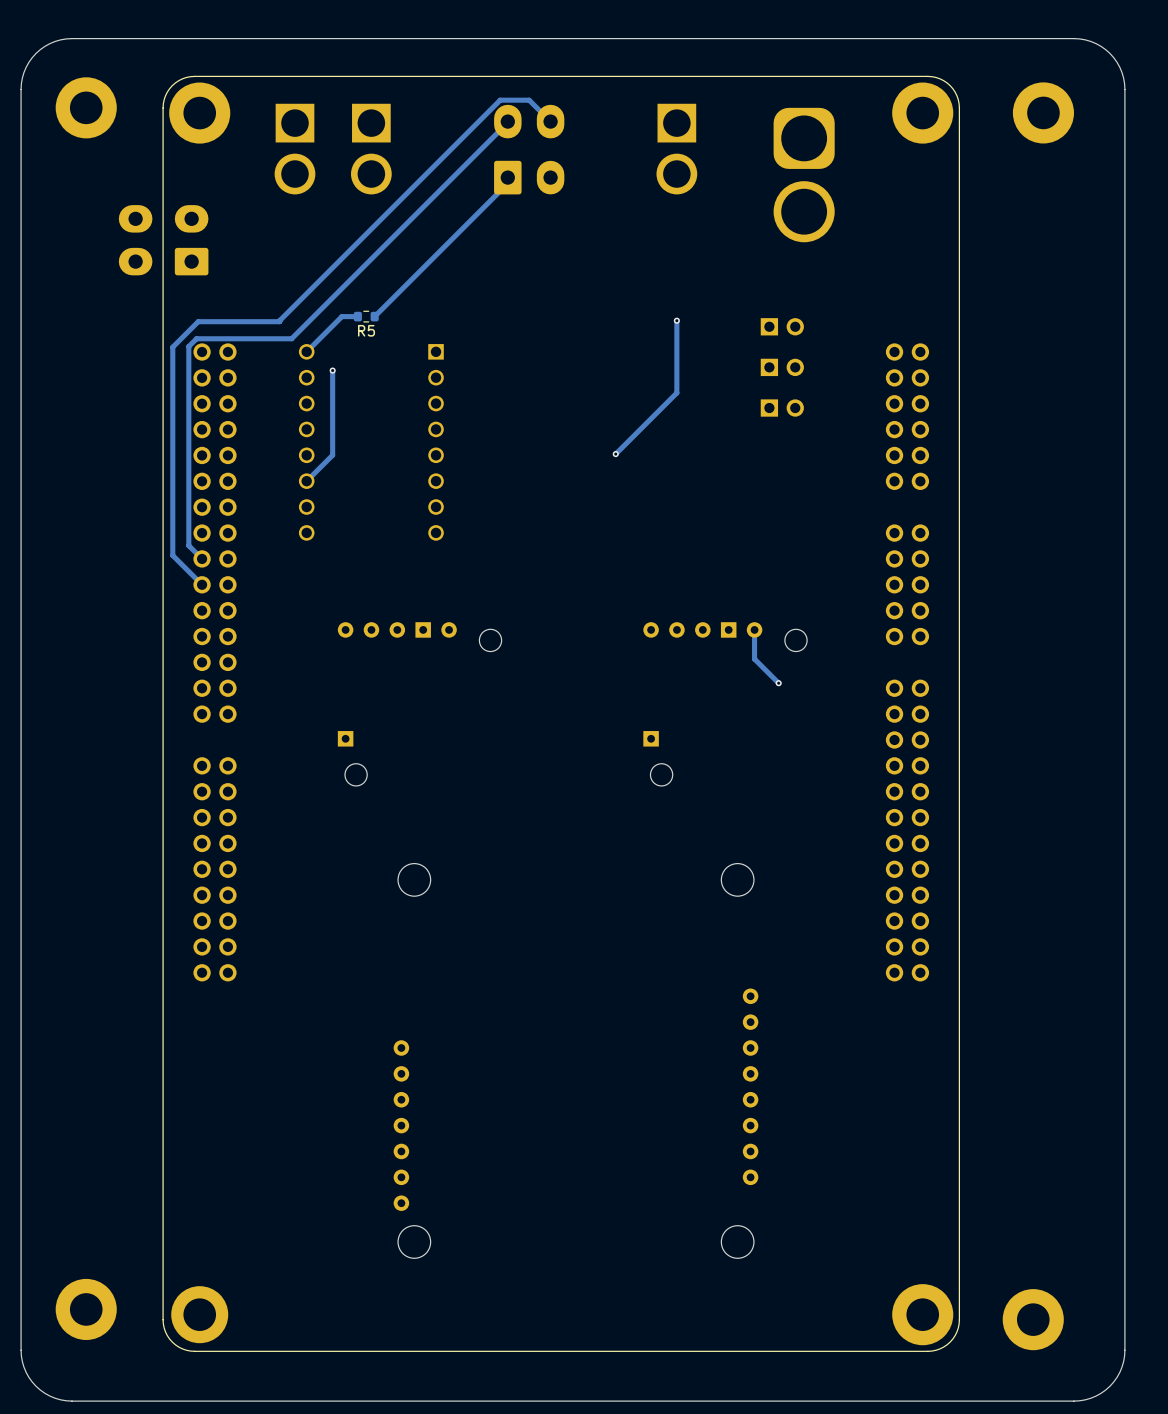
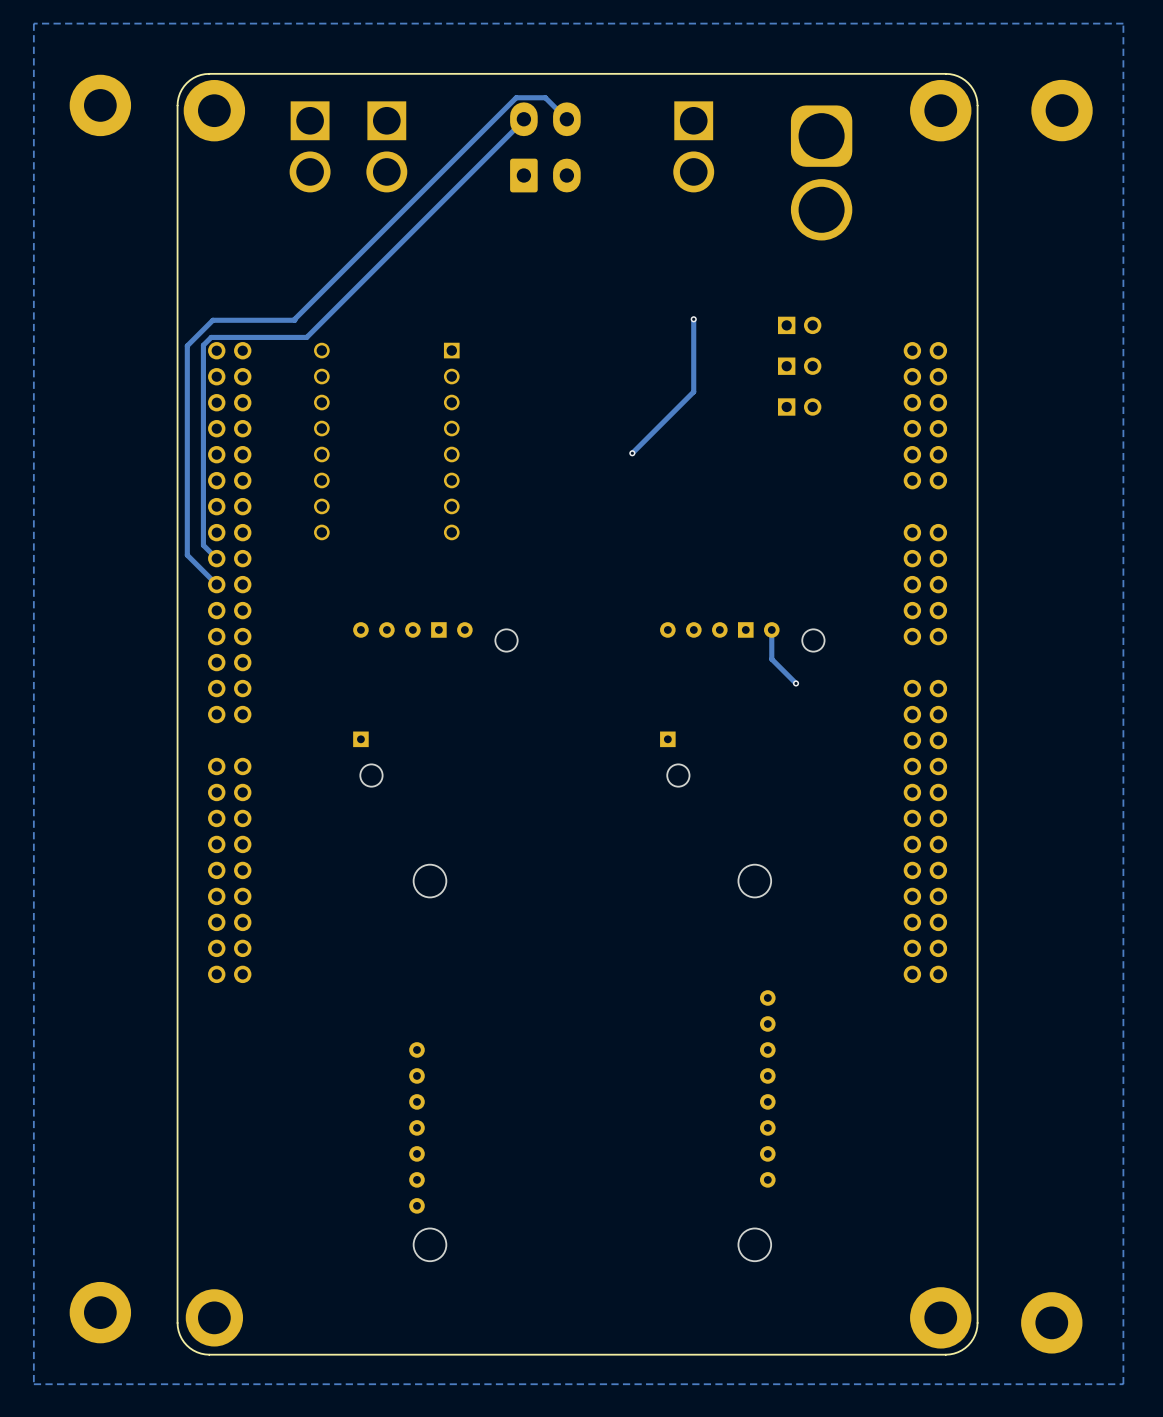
zone outline: none -> (1123, 23) (33, 23) (33, 1384) (1123, 1384) (1123, 23)
board edge: (1074, 38) (71, 38) (49, 43) (32, 57) (23, 72) (21, 89) (21, 1350) (26, 1372) (40, 1390) (55, 1398) (71, 1401) (1074, 1401) (1096, 1396) (1113, 1381) (1122, 1367) (1124, 1350) (1124, 89) (1119, 67) (1110, 53) (1090, 41) (1074, 38) -> none
track: (507, 177) (507, 183) (374, 316) -> none
part: (163, 240) -> none
track: (357, 316) (341, 316) (306, 351) -> none
R5: (366, 316) -> none
track: (332, 370) (332, 455) (306, 481) -> none
via: (332, 370) -> none

